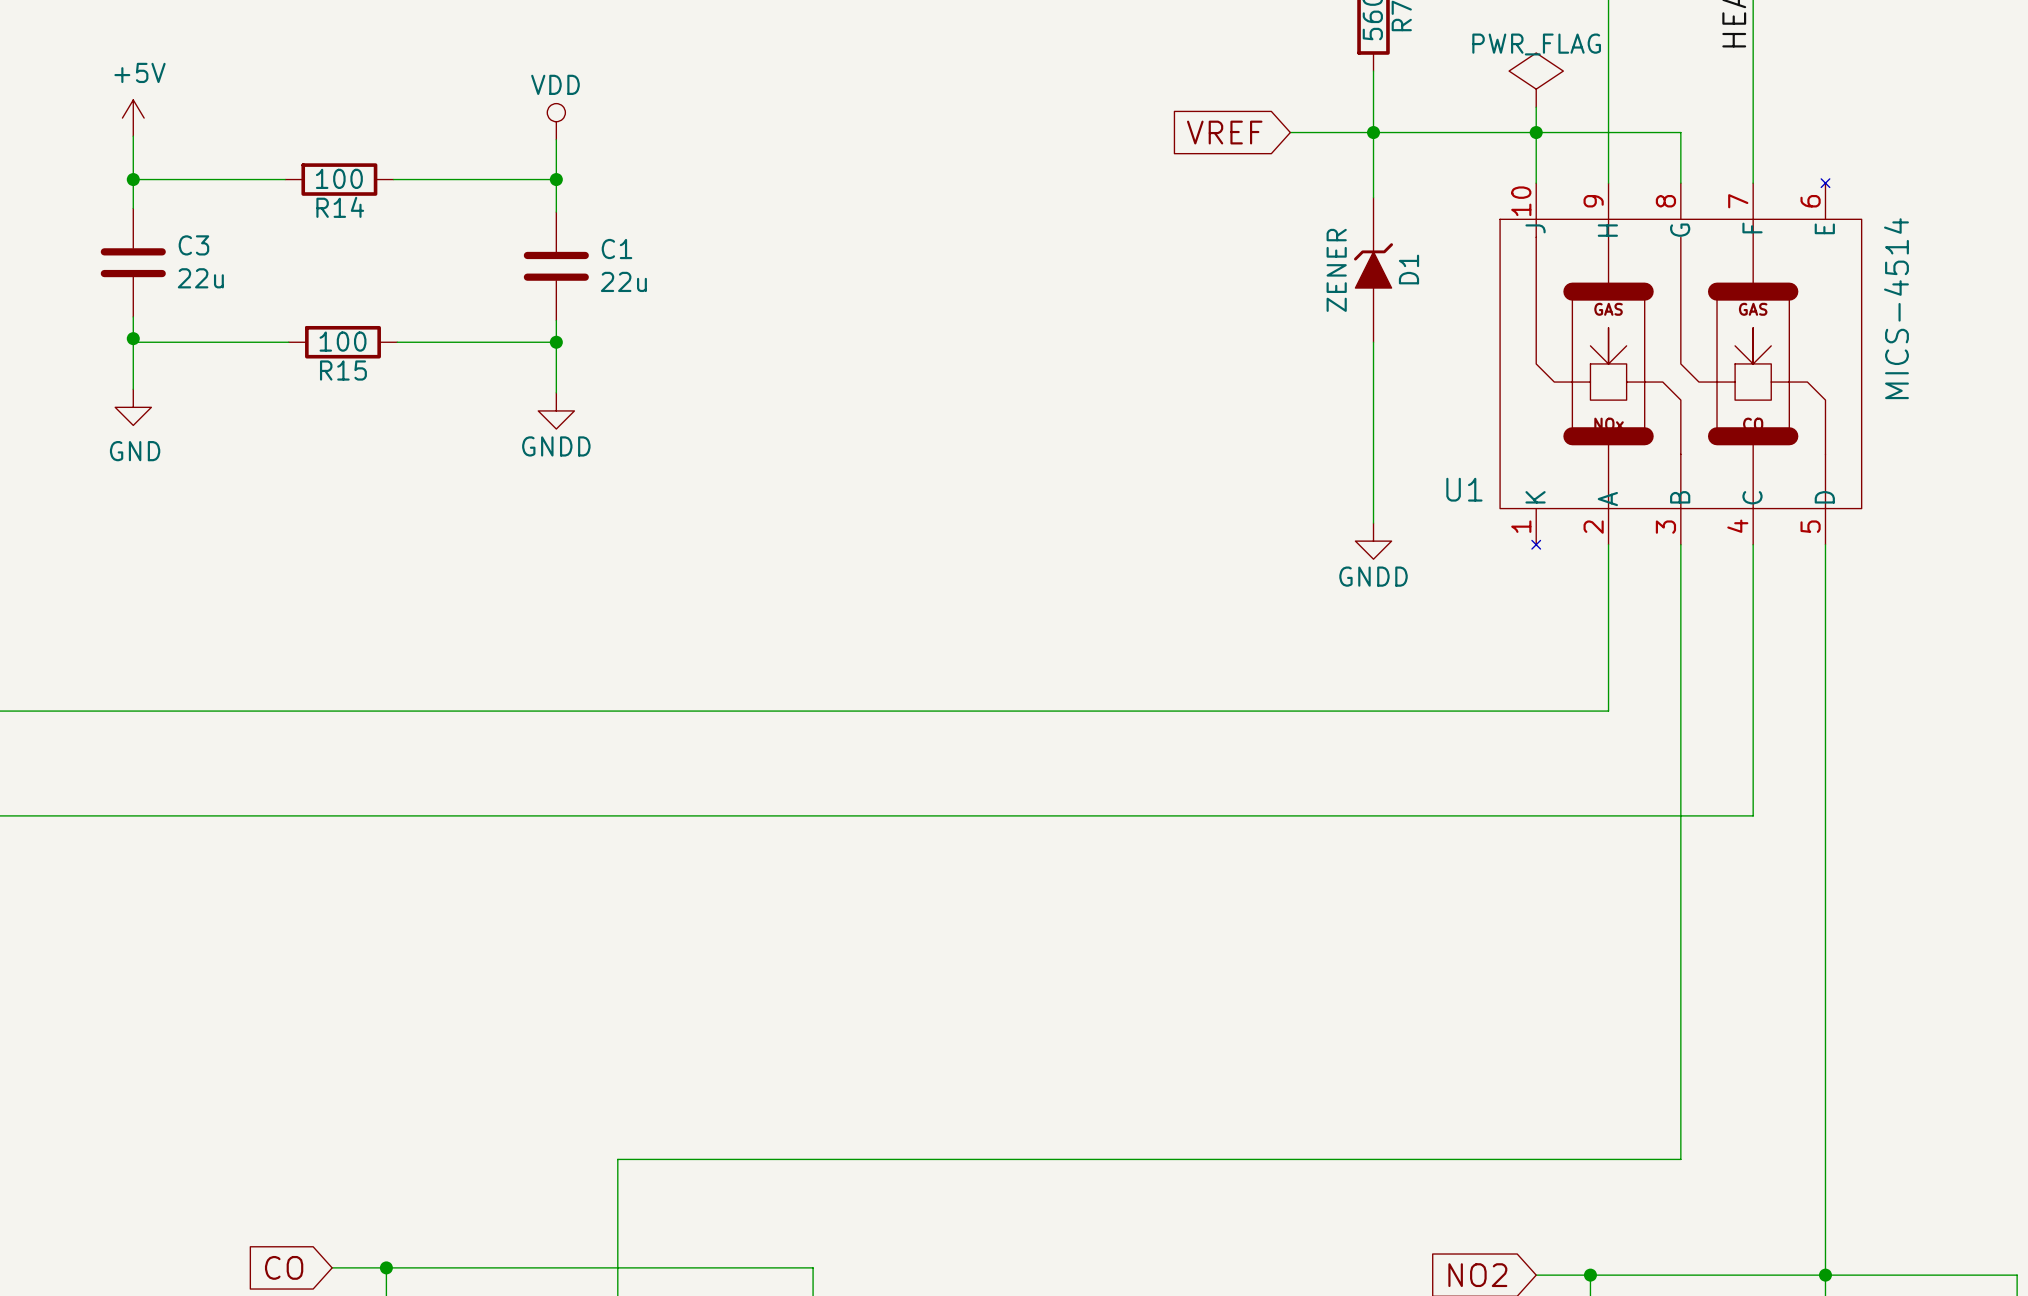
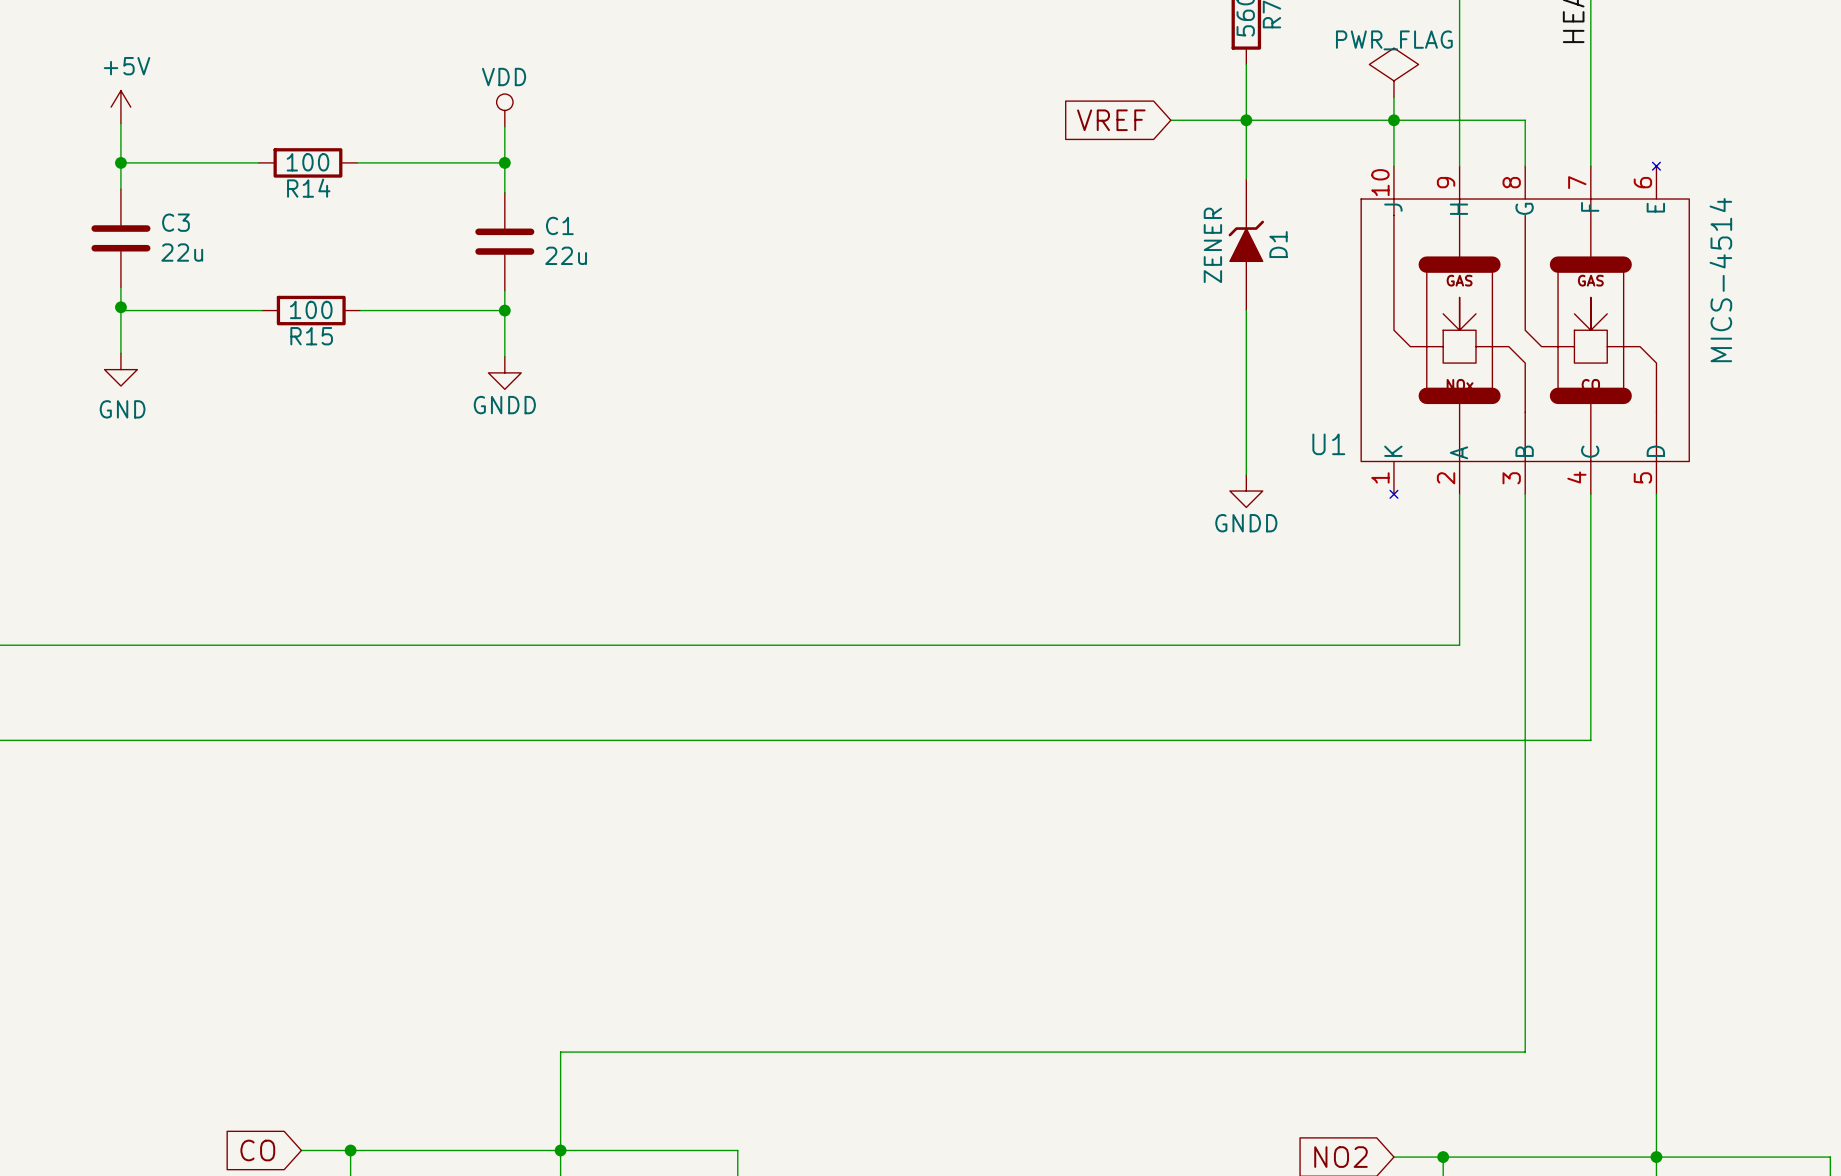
junction: none -> (560, 1150)

